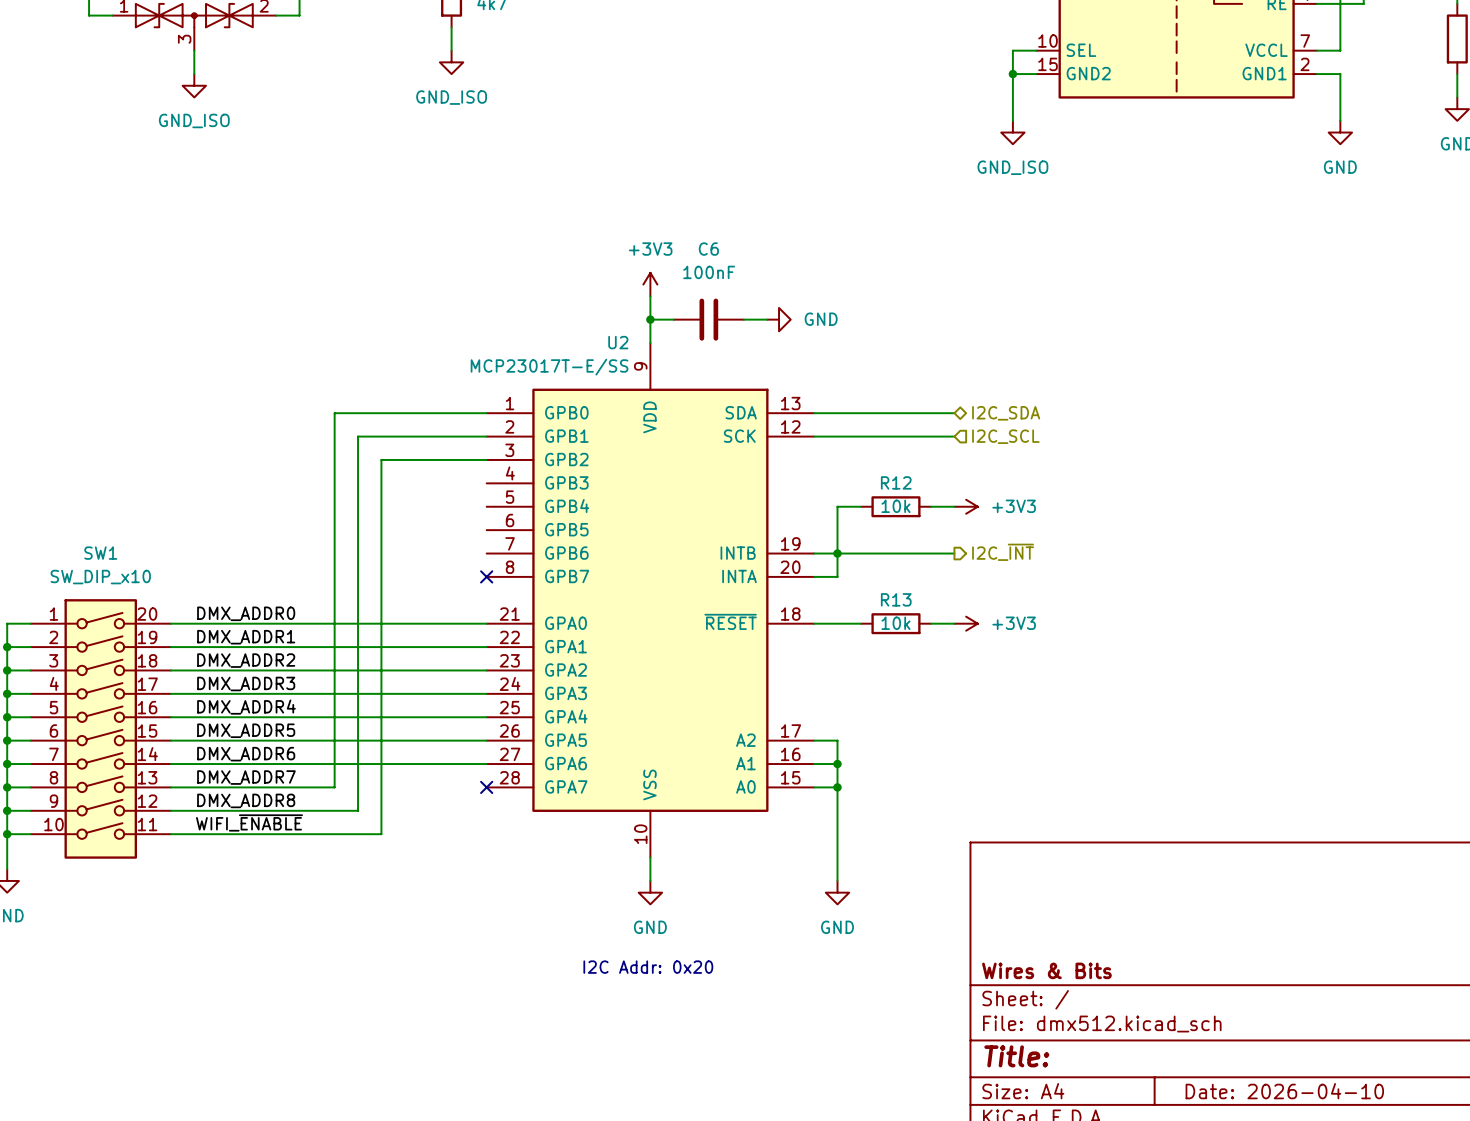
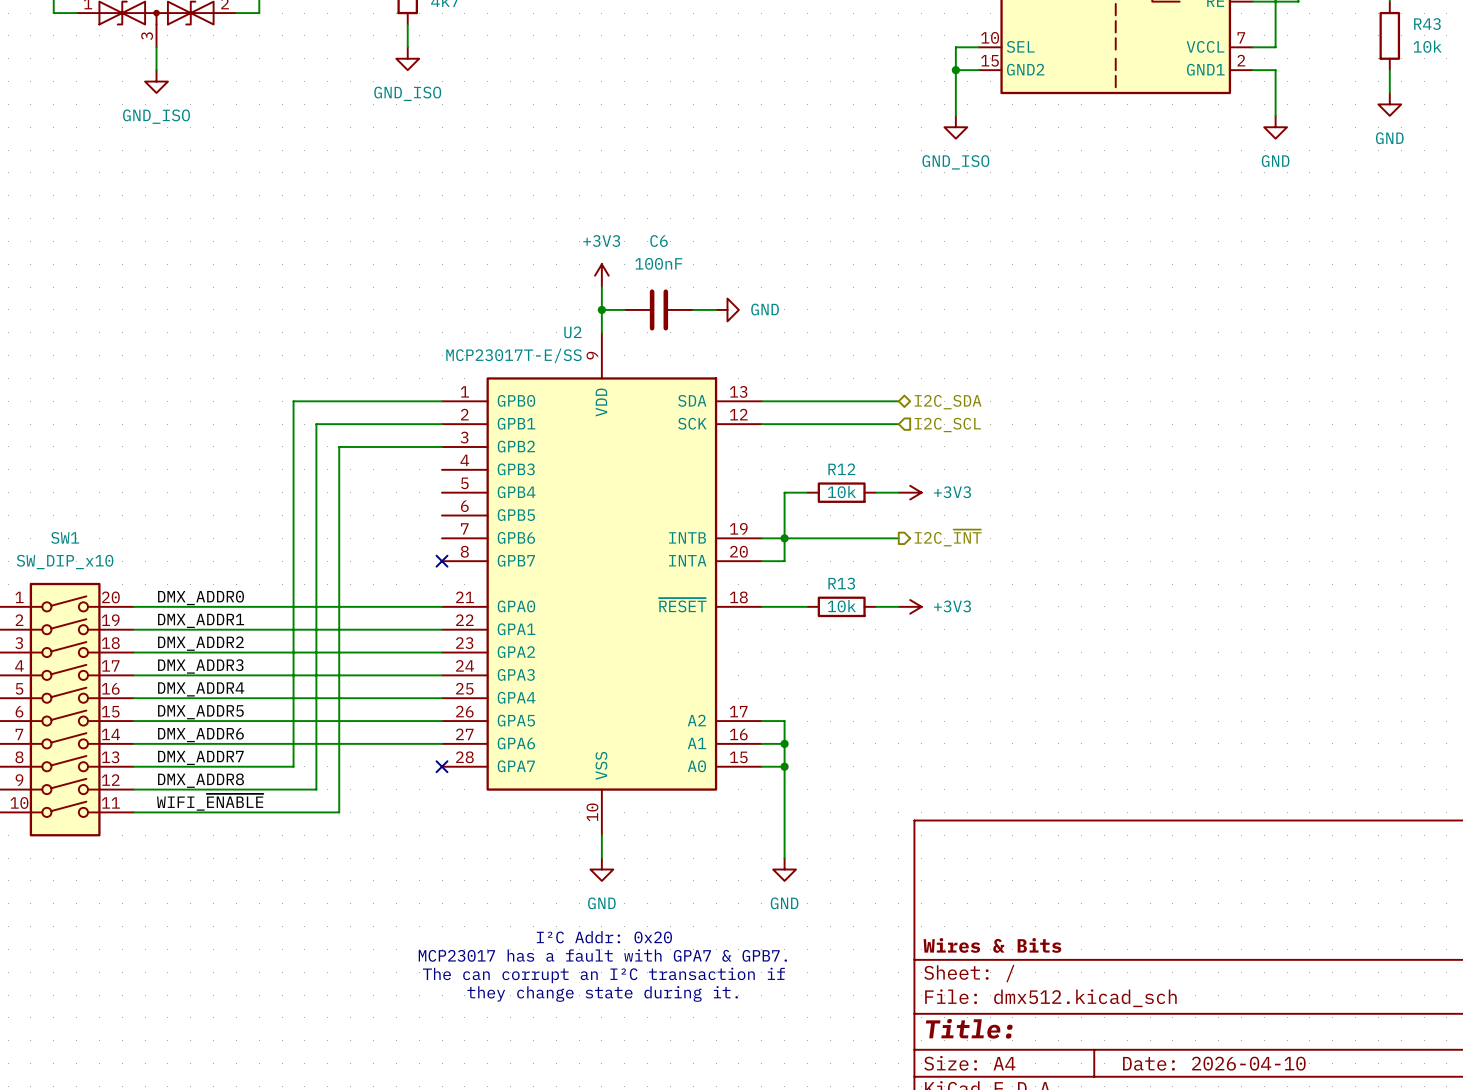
text: I2C Addr: 0x20 (648, 967) -> I²C Addr: 0x20 (604, 937)
text: none -> MCP23017 has a fault with GPA7 & GPB7. (602, 955)
text: none -> The can corrupt an I²C transaction if (603, 975)
text: none -> they change state during it. (602, 993)

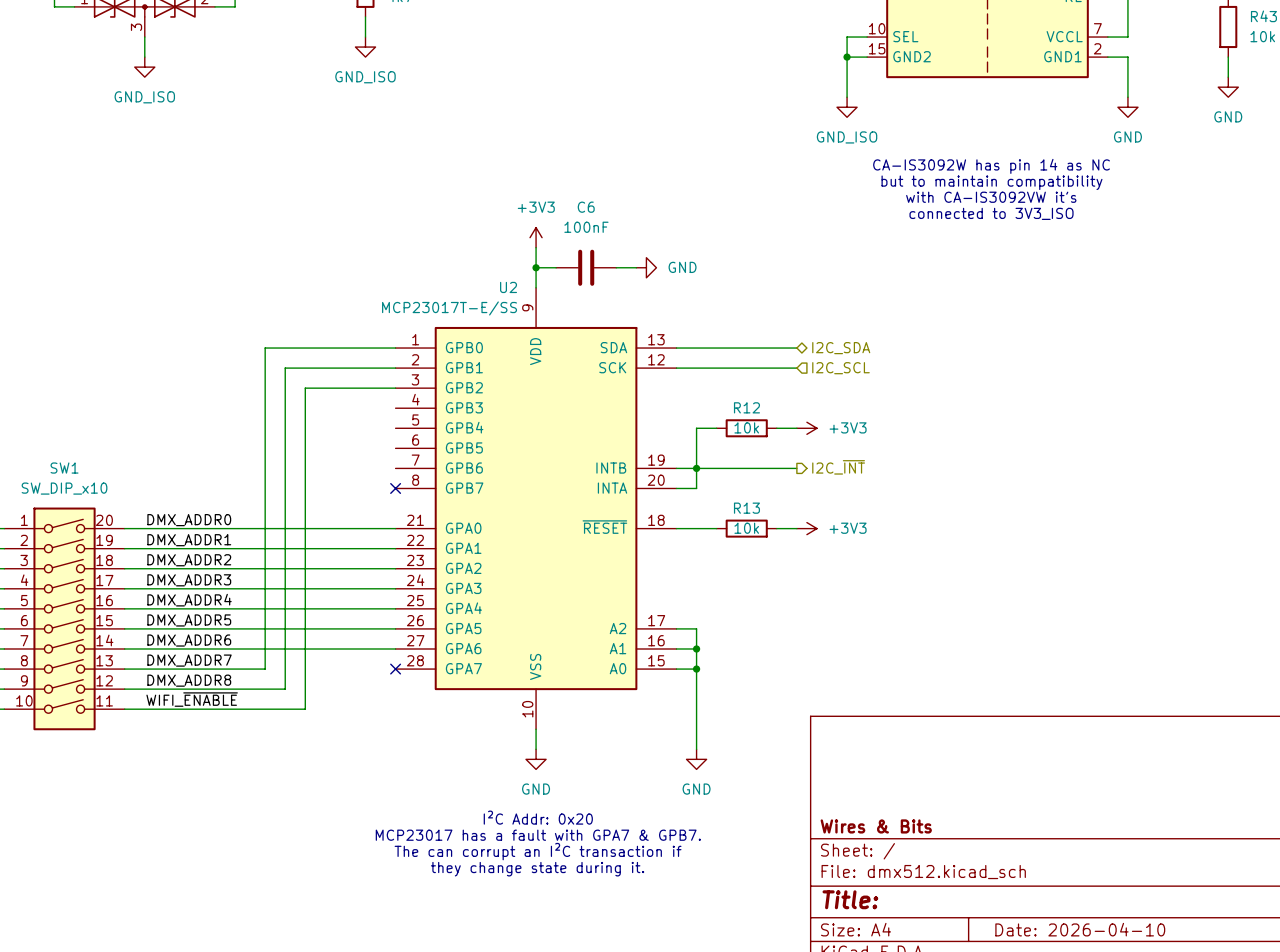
text: none -> CA-IS3092W has pin 14 as NC (991, 166)
text: none -> but to maintain compatibility (991, 182)
text: none -> with CA-IS3092VW it's (991, 197)
text: none -> connected to 3V3_ISO (991, 213)

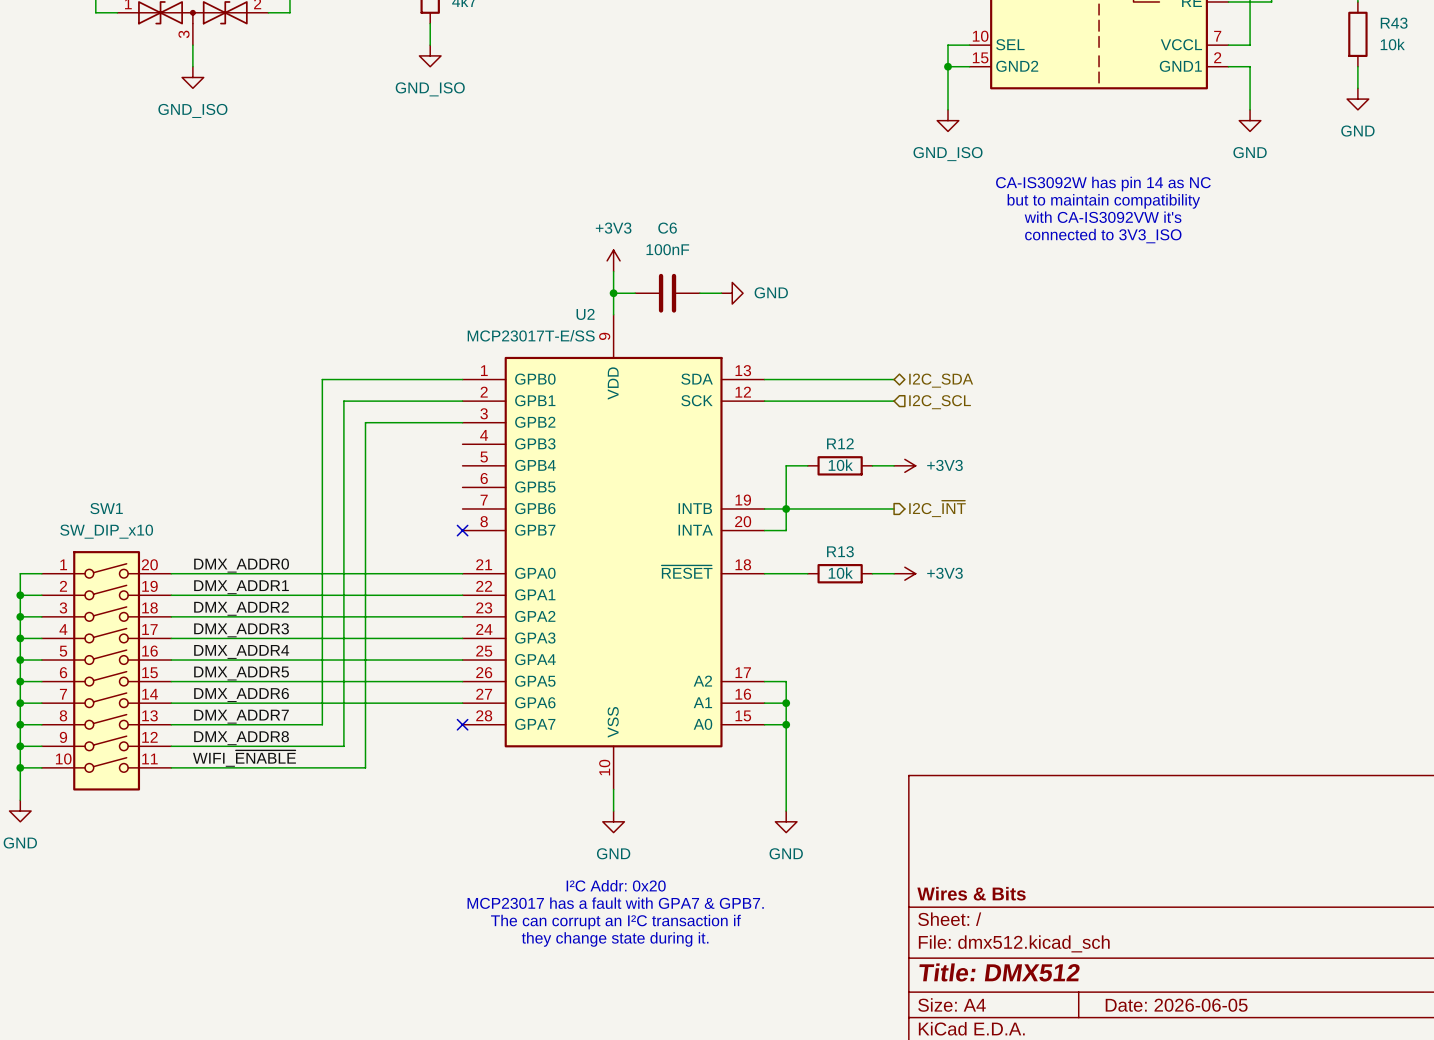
title block: Title: (850, 899) -> Title: DMX512 (999, 972)
title block: Date: 2026-04-10 (1080, 929) -> Date: 2026-06-05 (1176, 1005)

